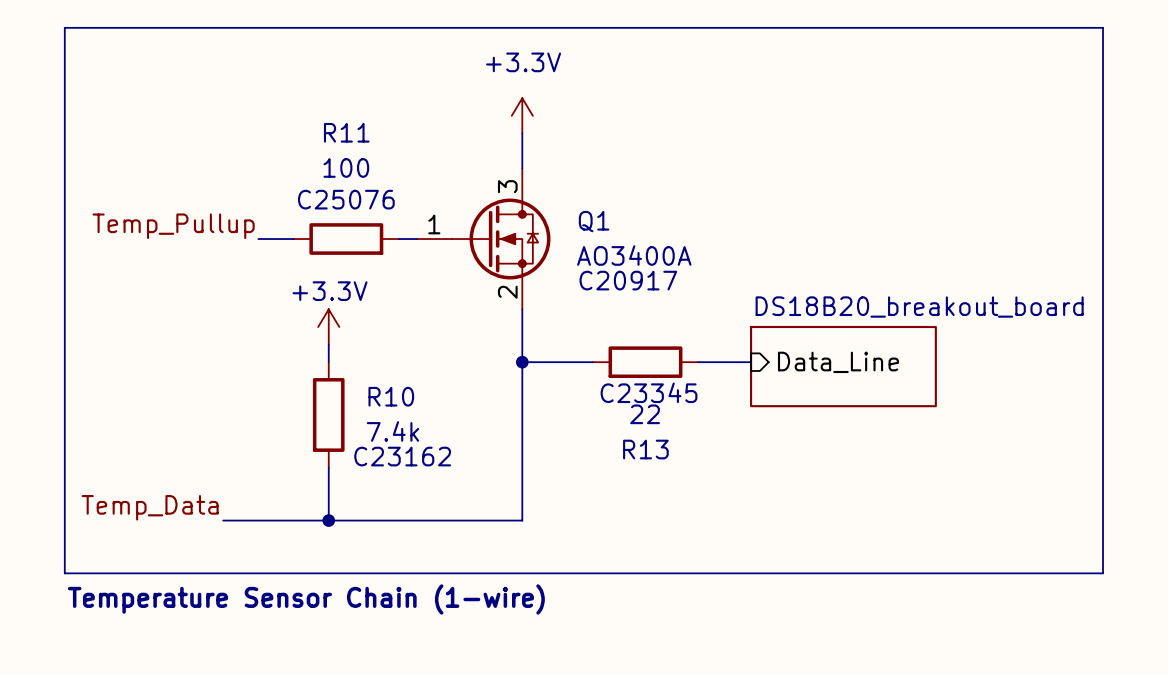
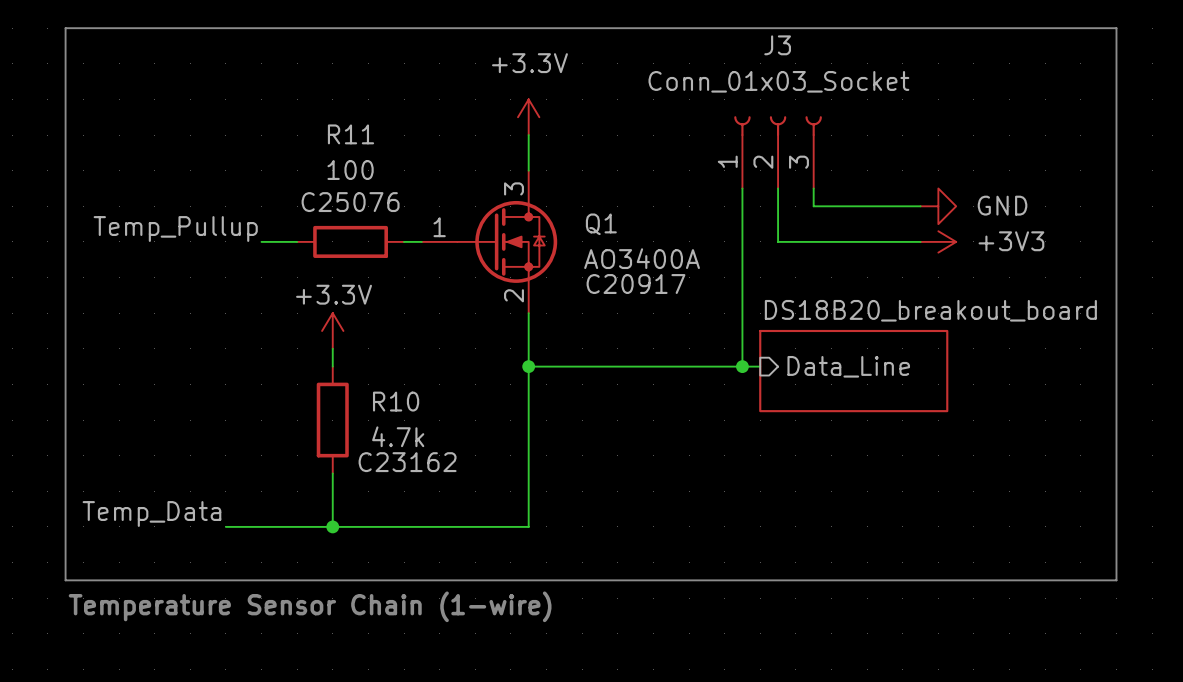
J3: none -> Conn_01x03_Socket (778, 152)
wire: none -> (742, 188) (742, 366)
wire: none -> (778, 188) (778, 241) (920, 241)
wire: none -> (813, 188) (813, 206) (920, 206)
power symbol: none -> GND (938, 206)
power symbol: none -> +3V3 (938, 241)
wire: none -> (599, 366) (706, 366)
R13: 22 (645, 362) -> none
junction: none -> (742, 366)
R10 value: 7.4k (392, 431) -> 4.7k (398, 436)

